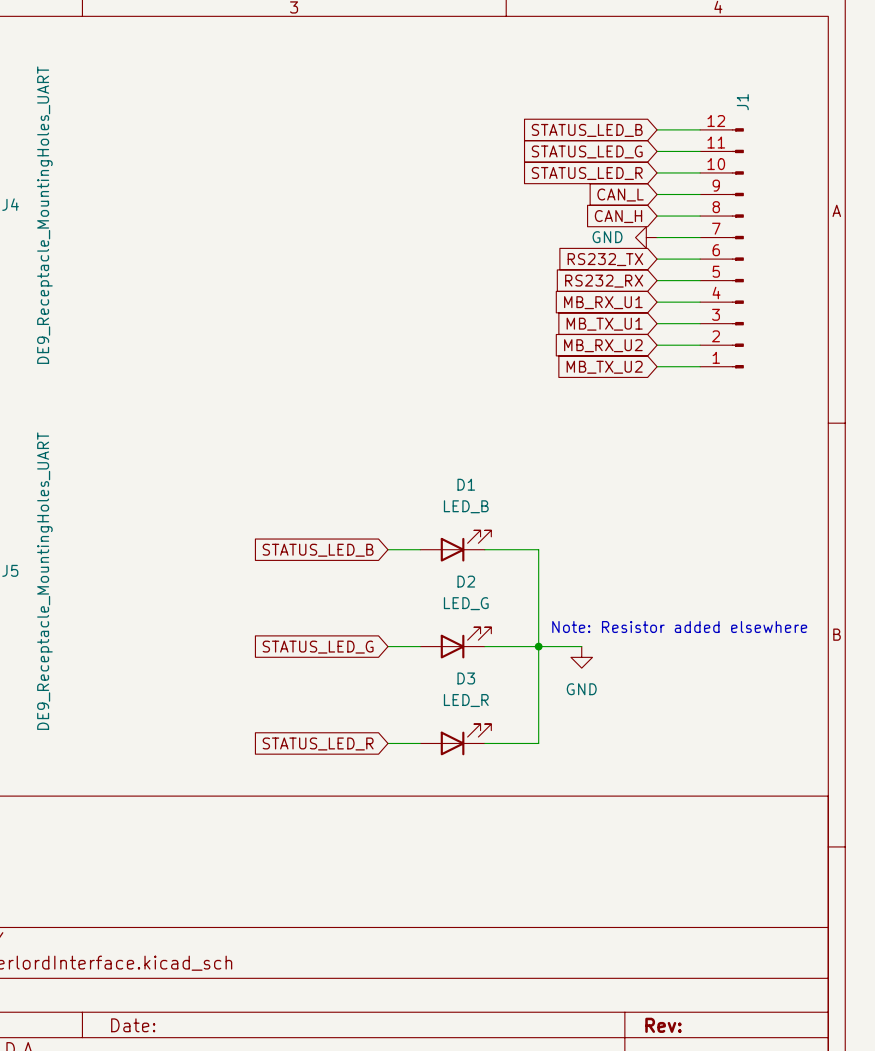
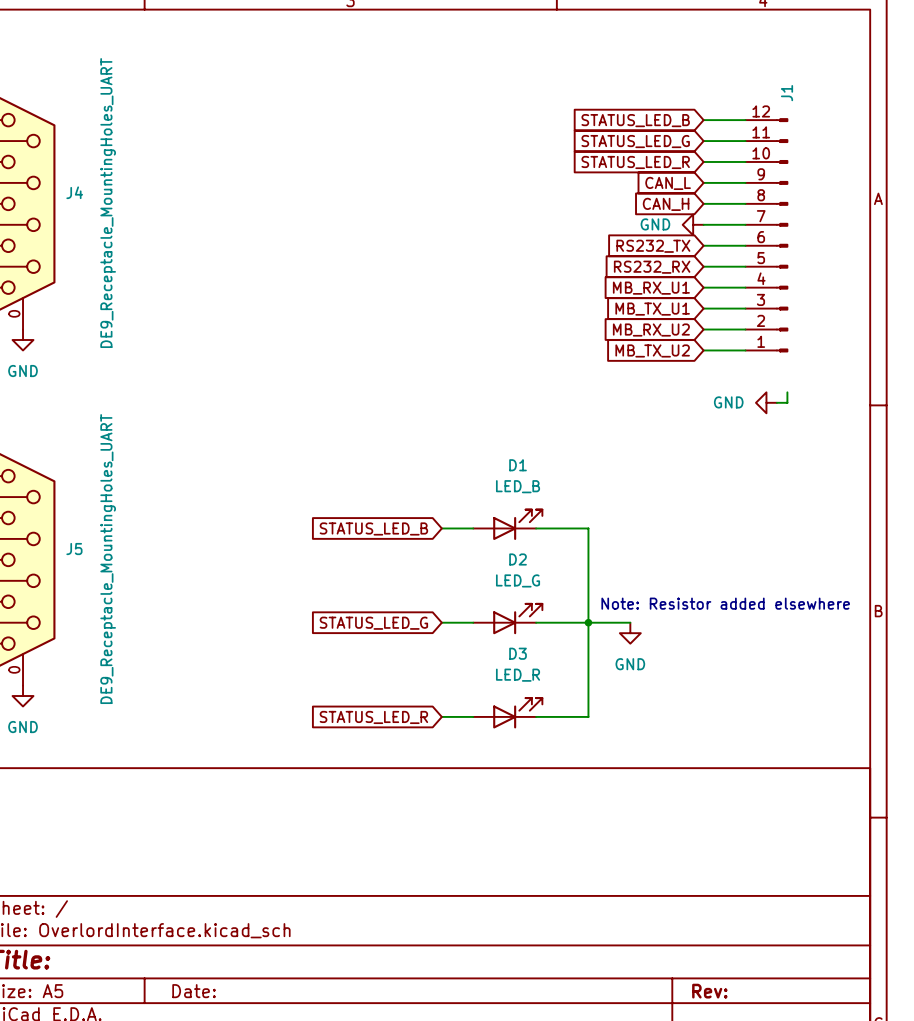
wire: none -> (787, 392) (787, 402) (776, 402)
power symbol: none -> GND (766, 402)

